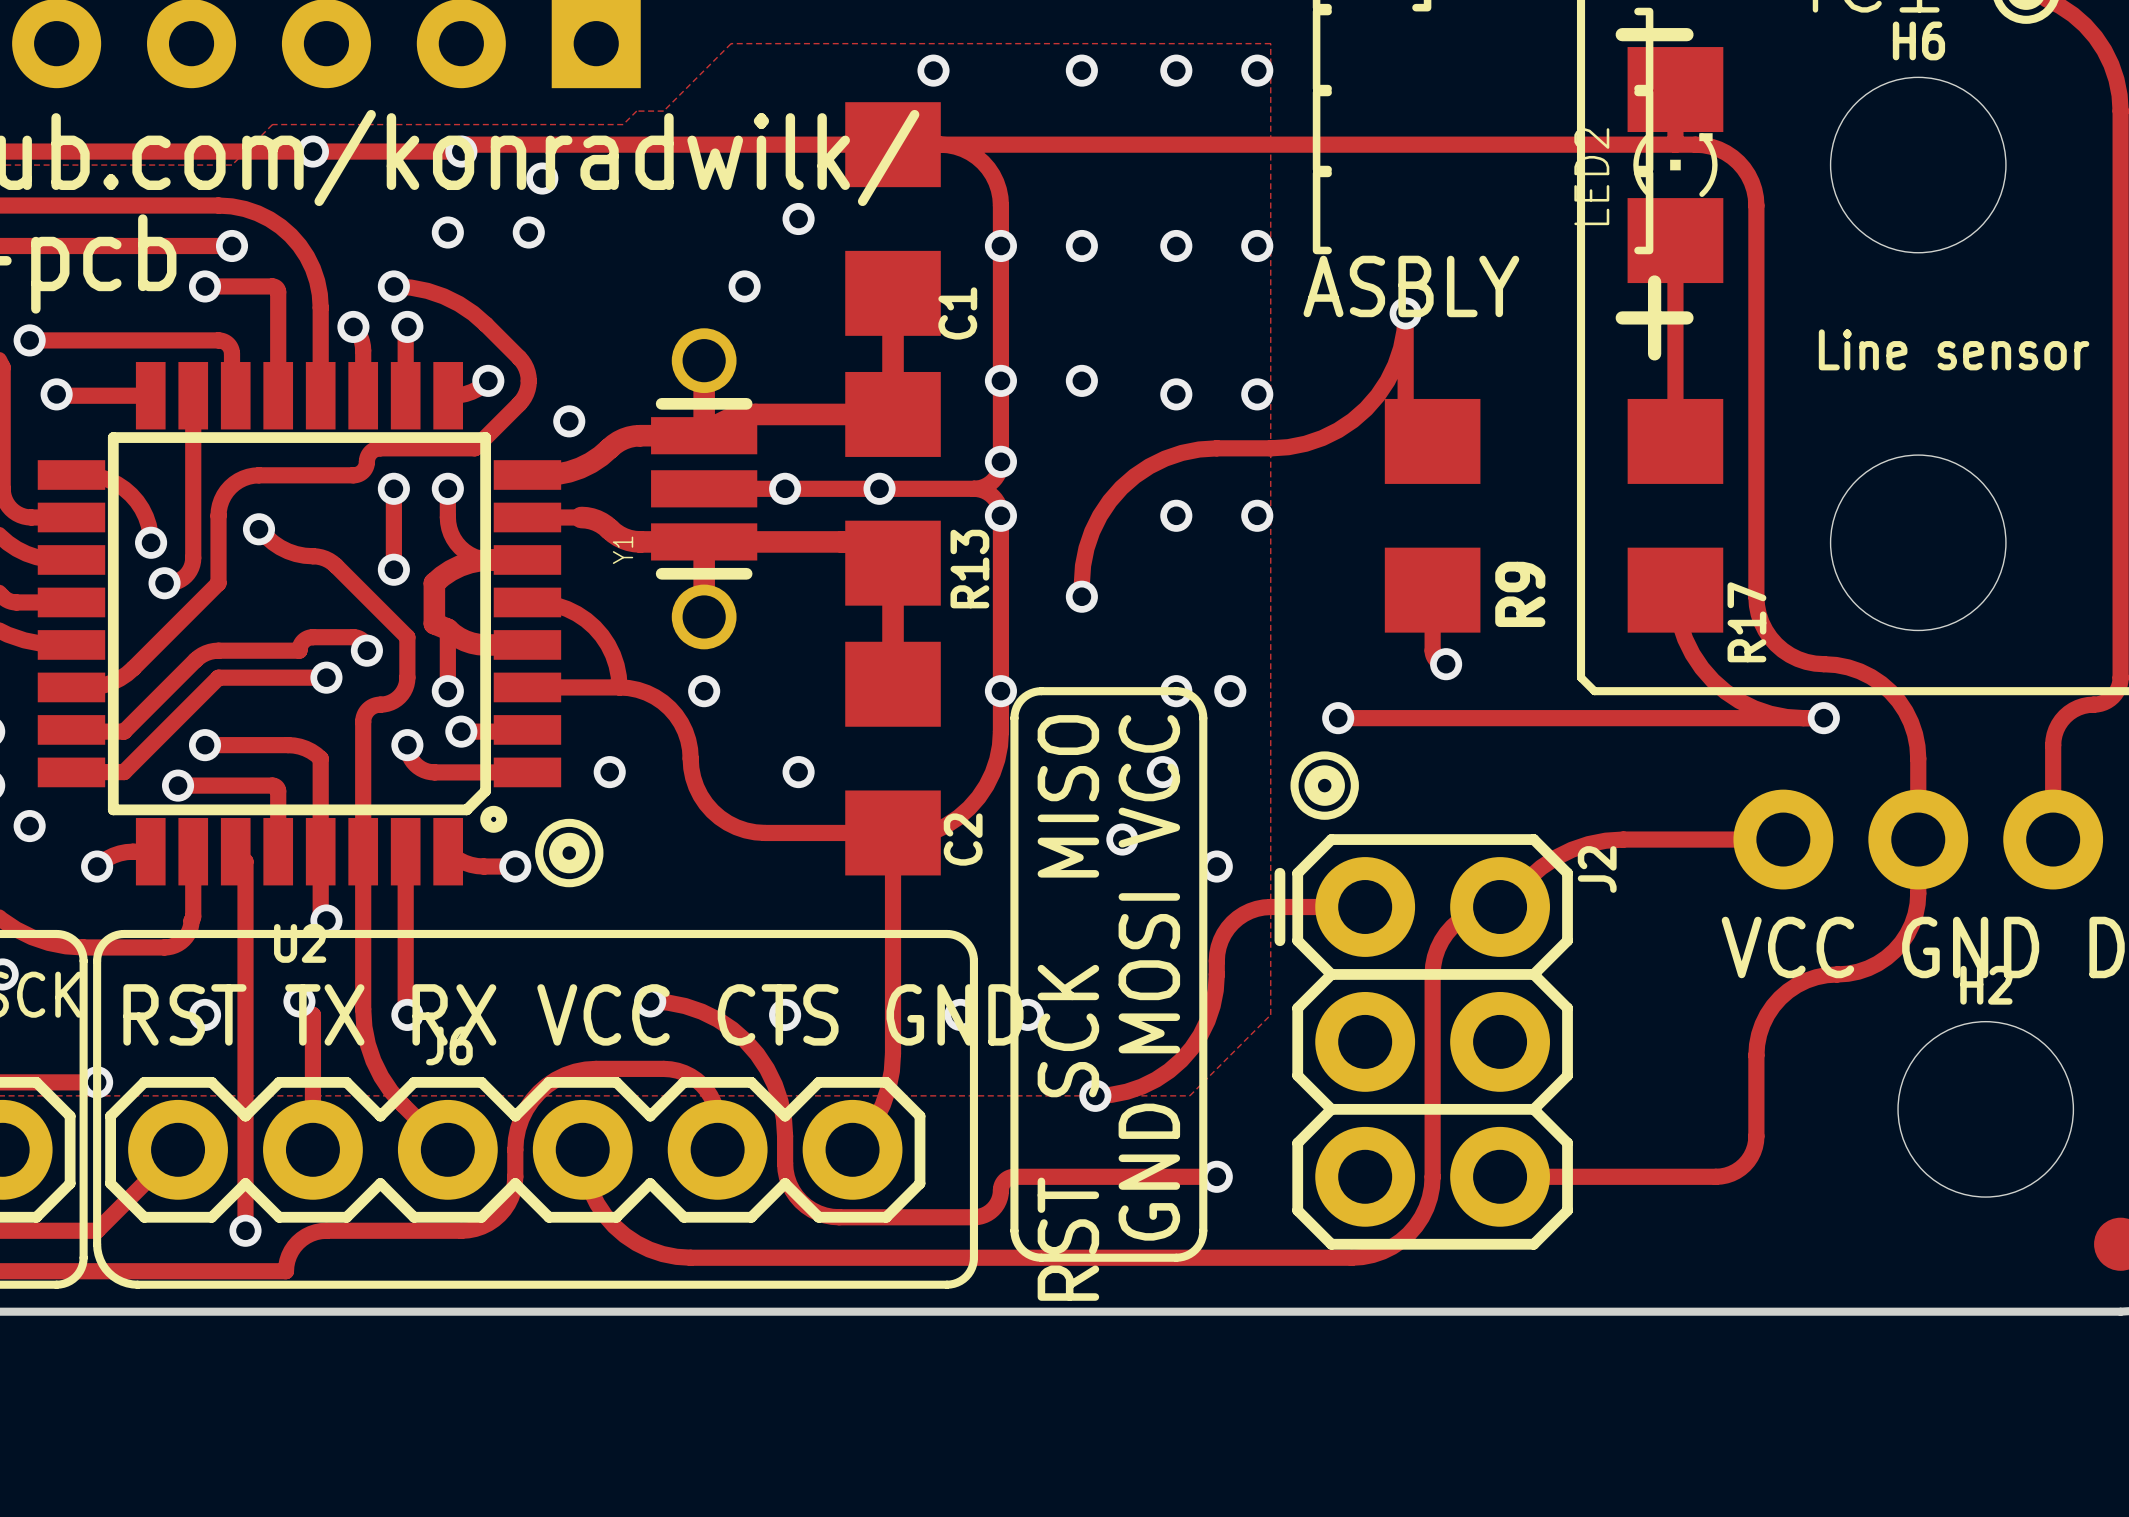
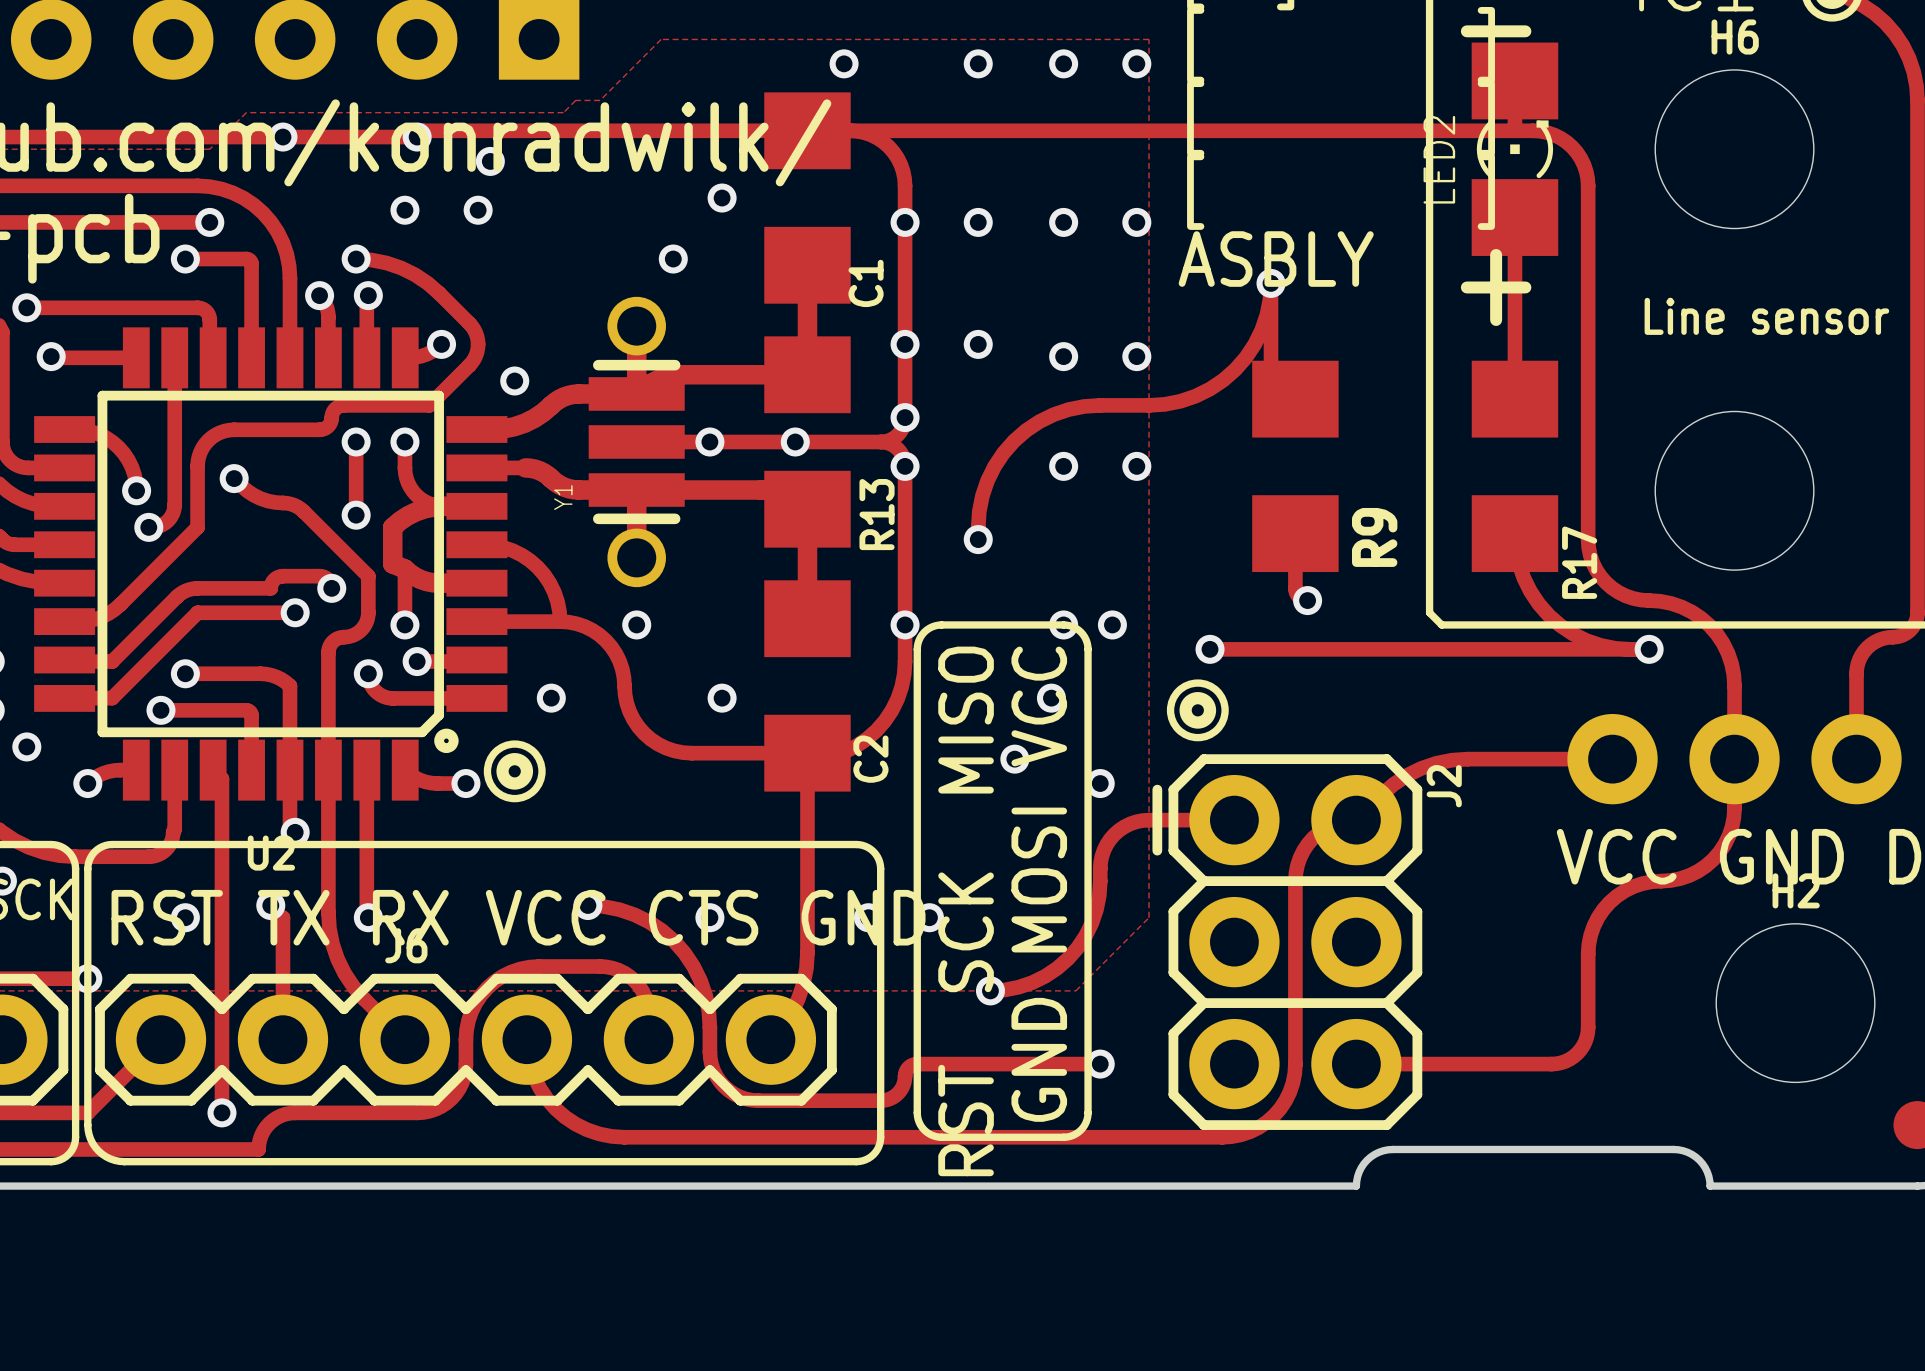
board edge: (1500, 1311) (1891, 1311) -> (1356, 1186) (1359, 1172) (1367, 1160) (1378, 1152) (1392, 1149) (1678, 1149) (1691, 1154) (1702, 1163) (1707, 1172) (1710, 1186)

